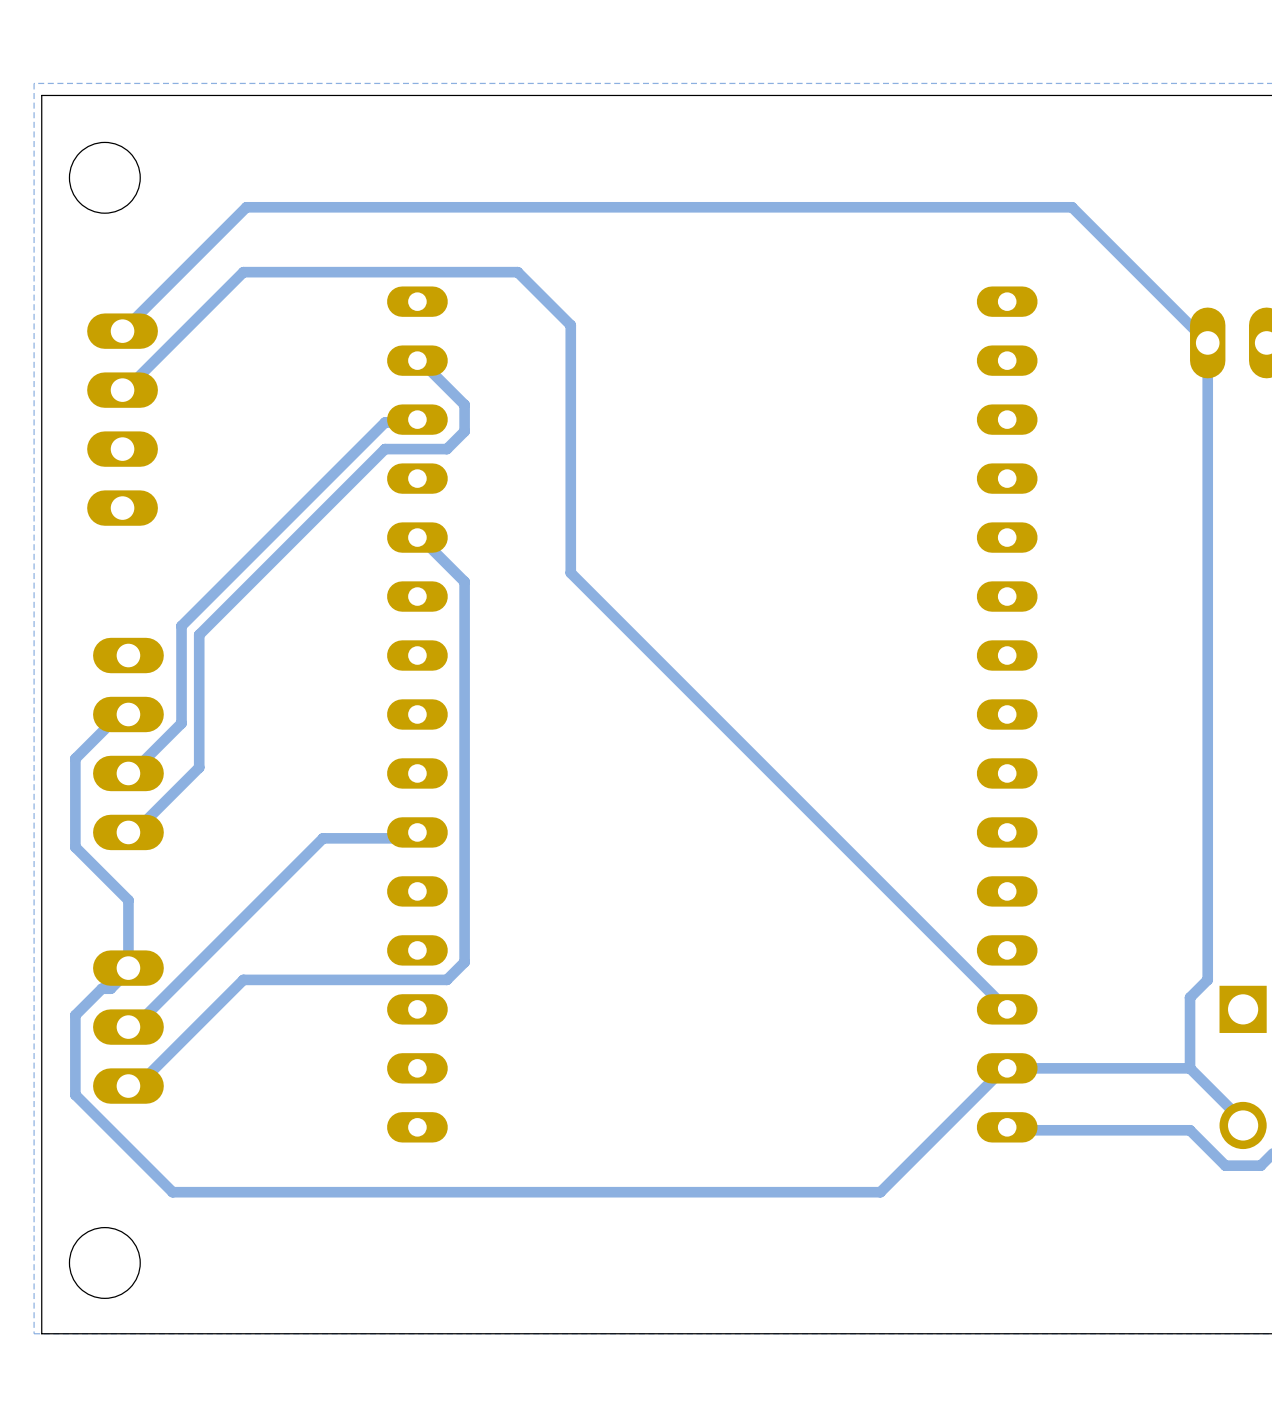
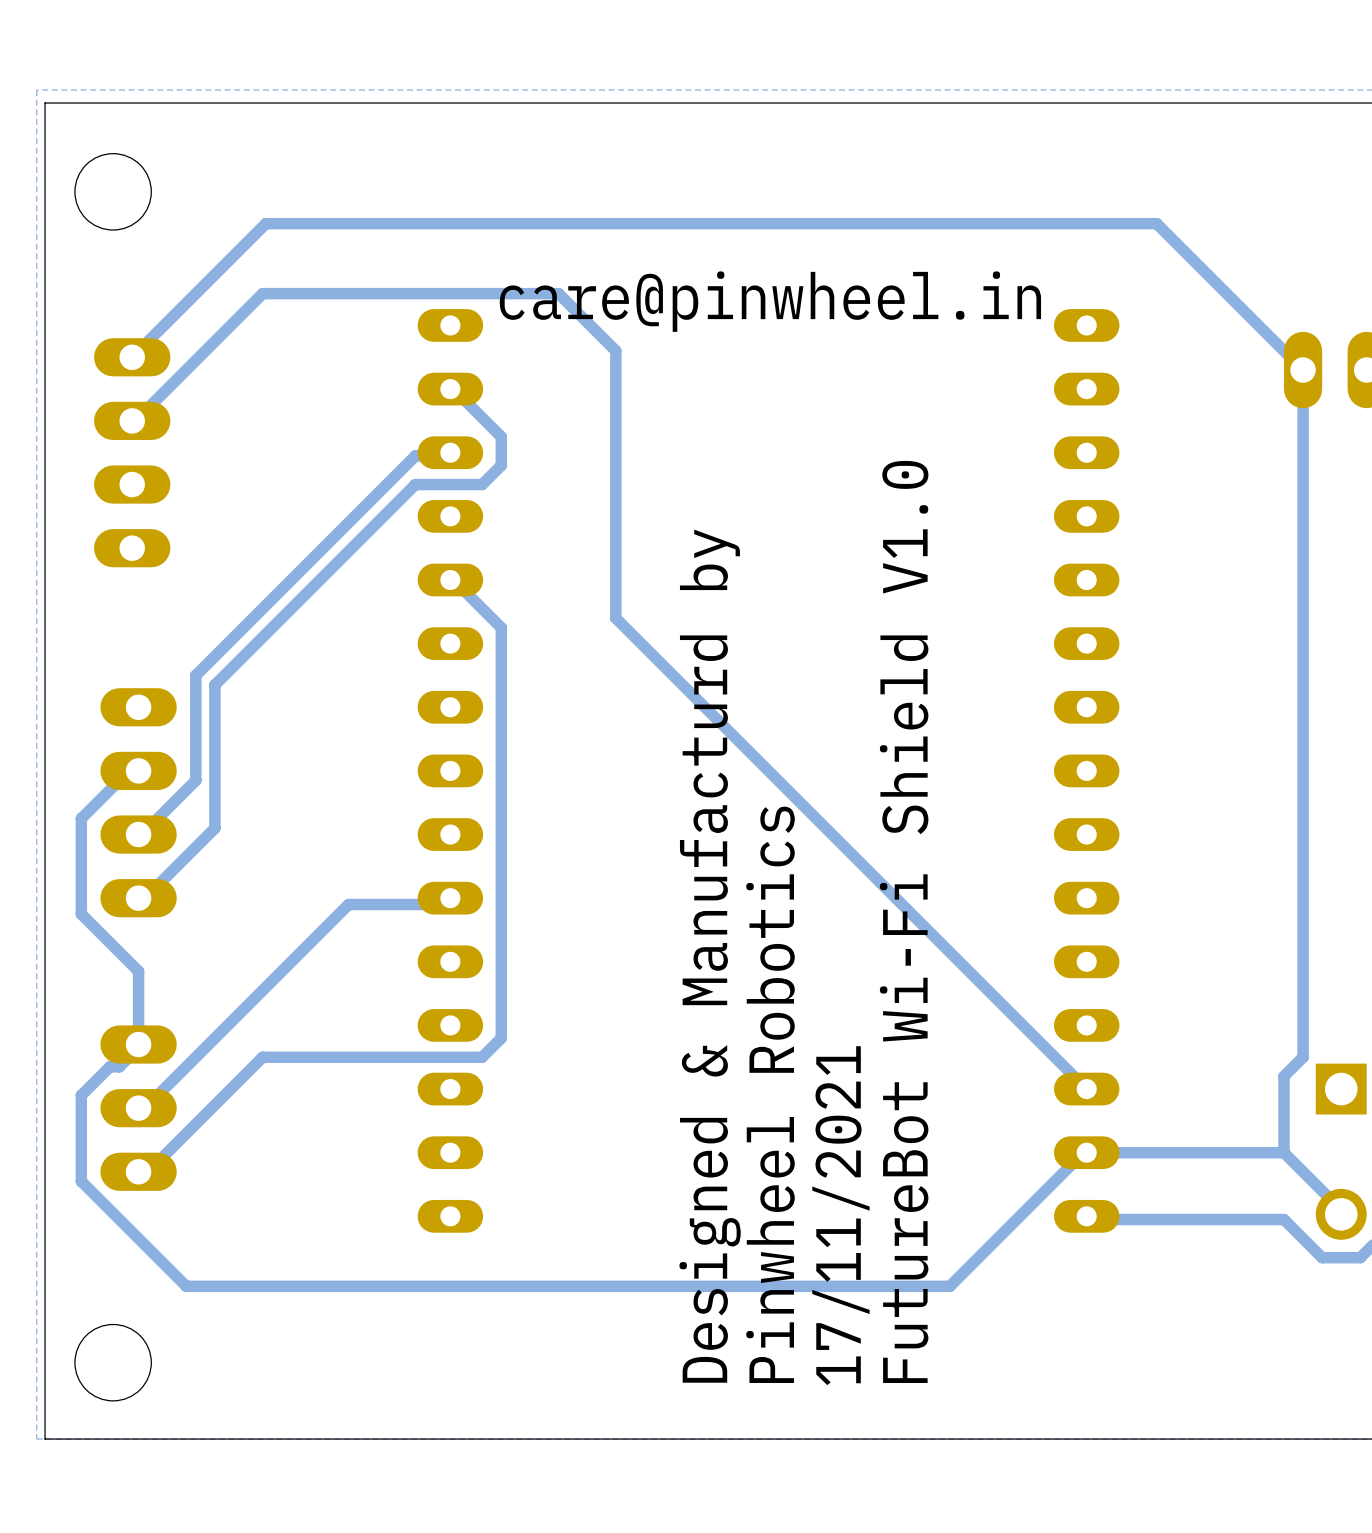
text: none -> care@pinwheel.in (770, 301)
text: none -> FutureBot Wi-Fi Shield V1.0 (904, 921)
text: none -> Designed & Manufacturd by (710, 956)
text: none -> Pinwheel Robotics (770, 1094)
text: none -> 17/11/2021 (840, 1215)

